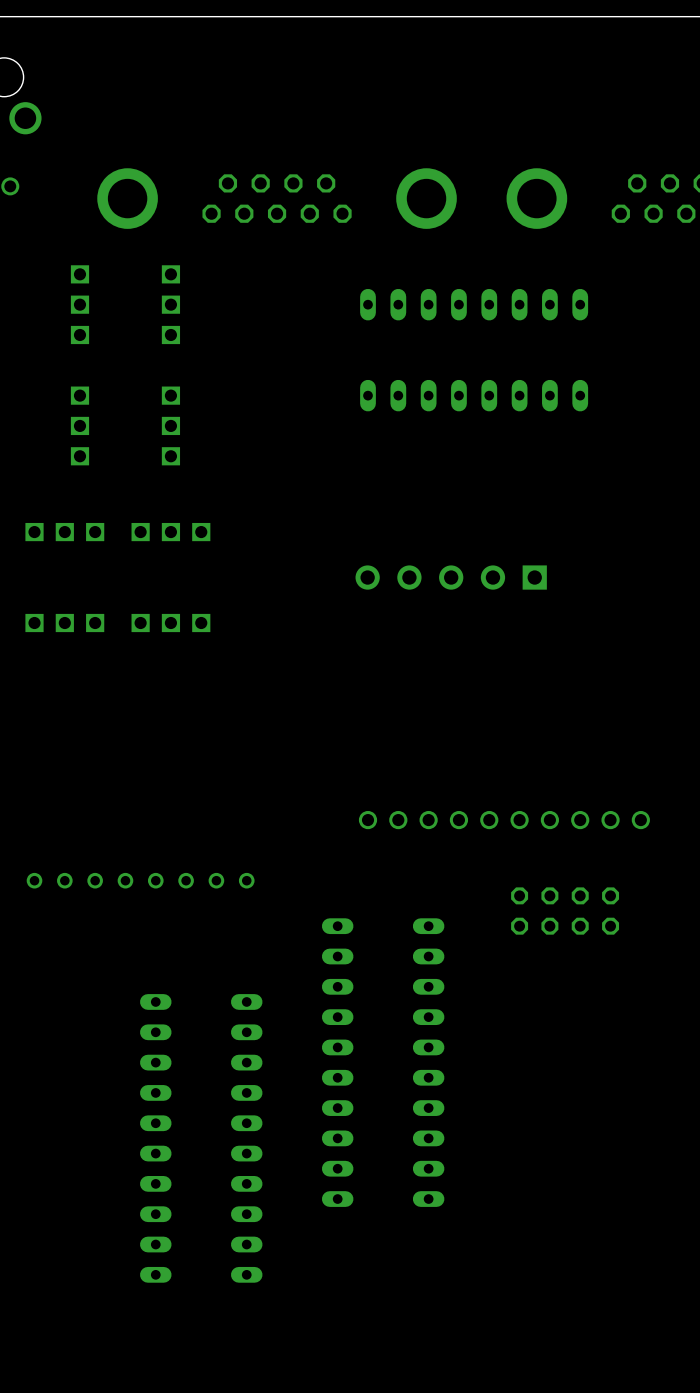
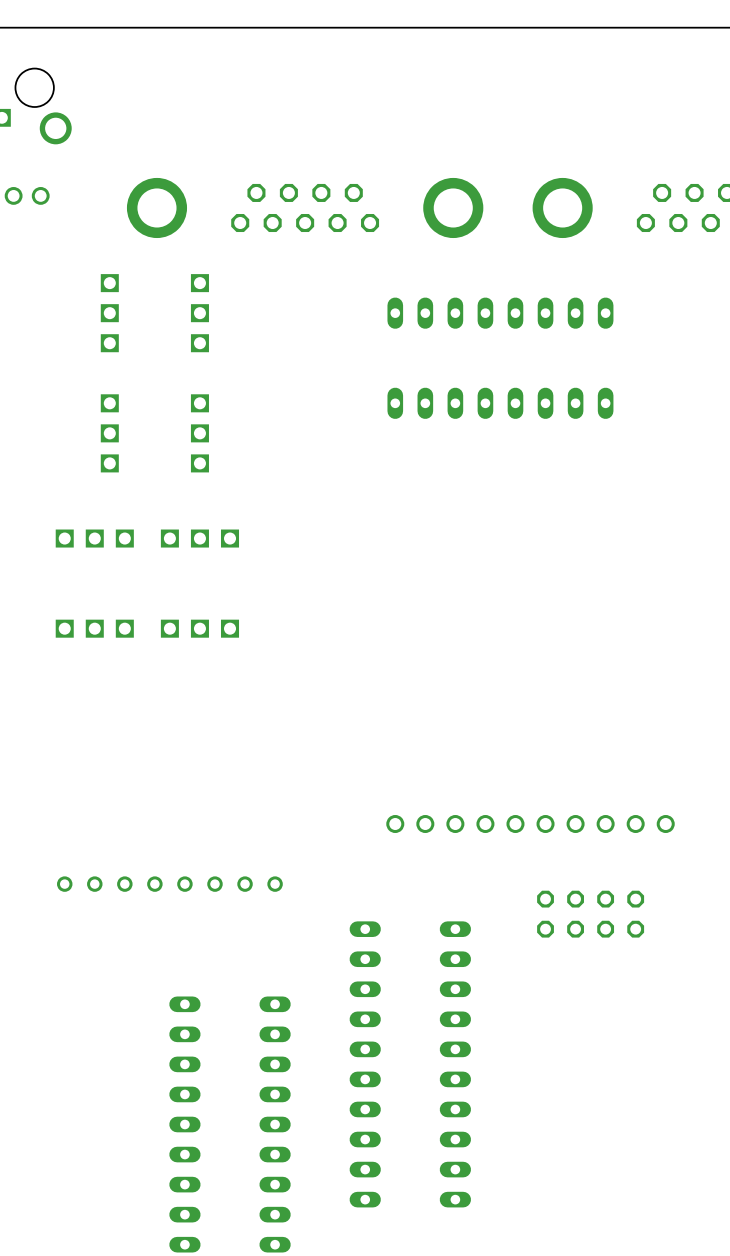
part: (451, 577) -> none

